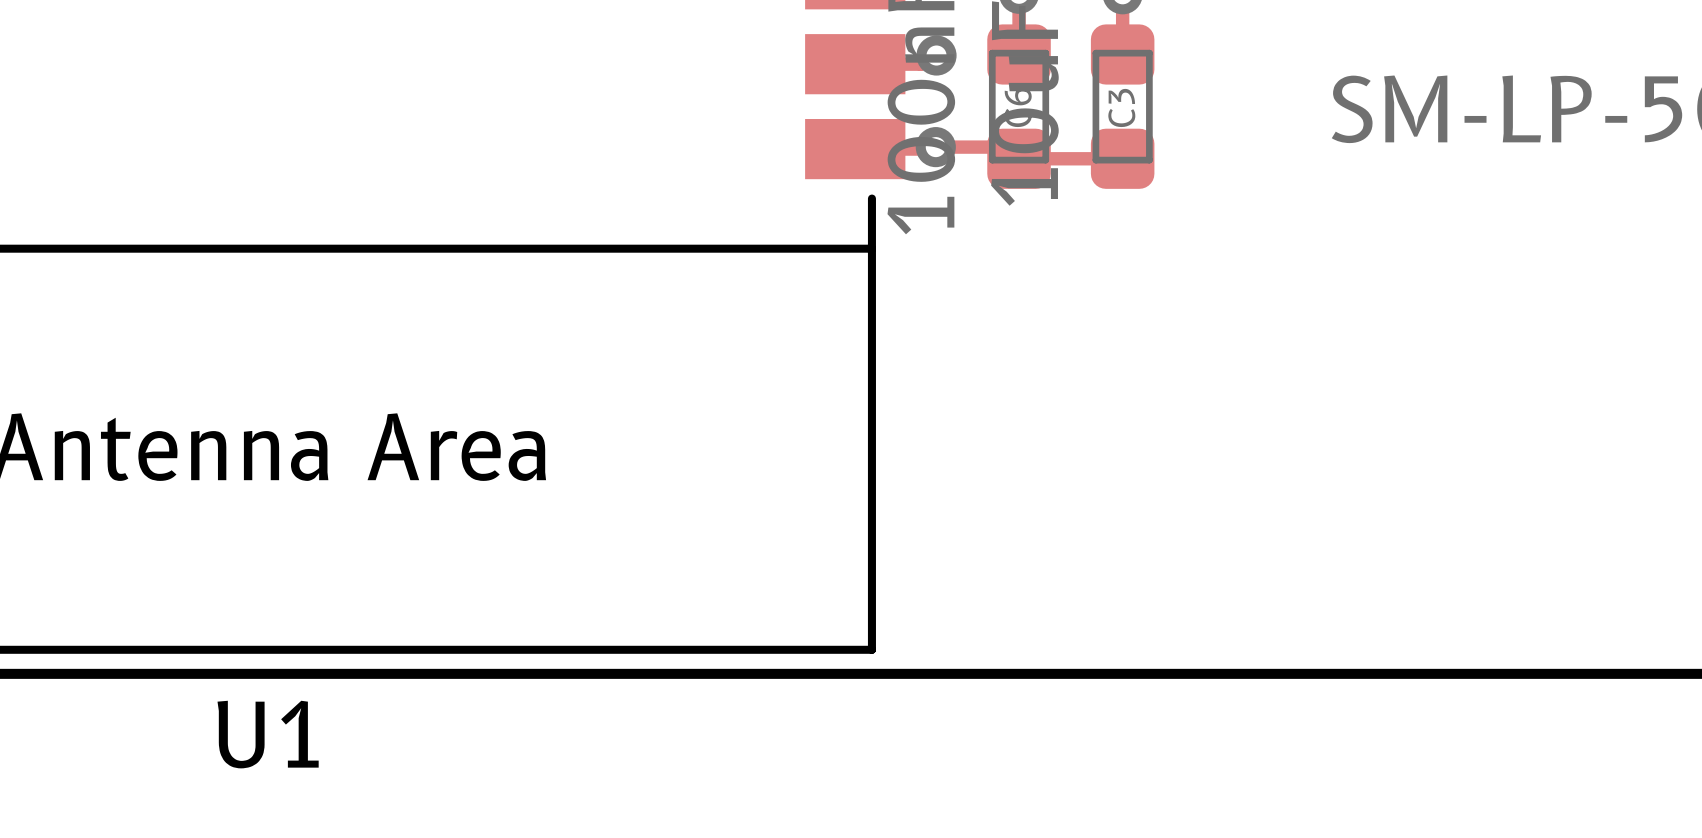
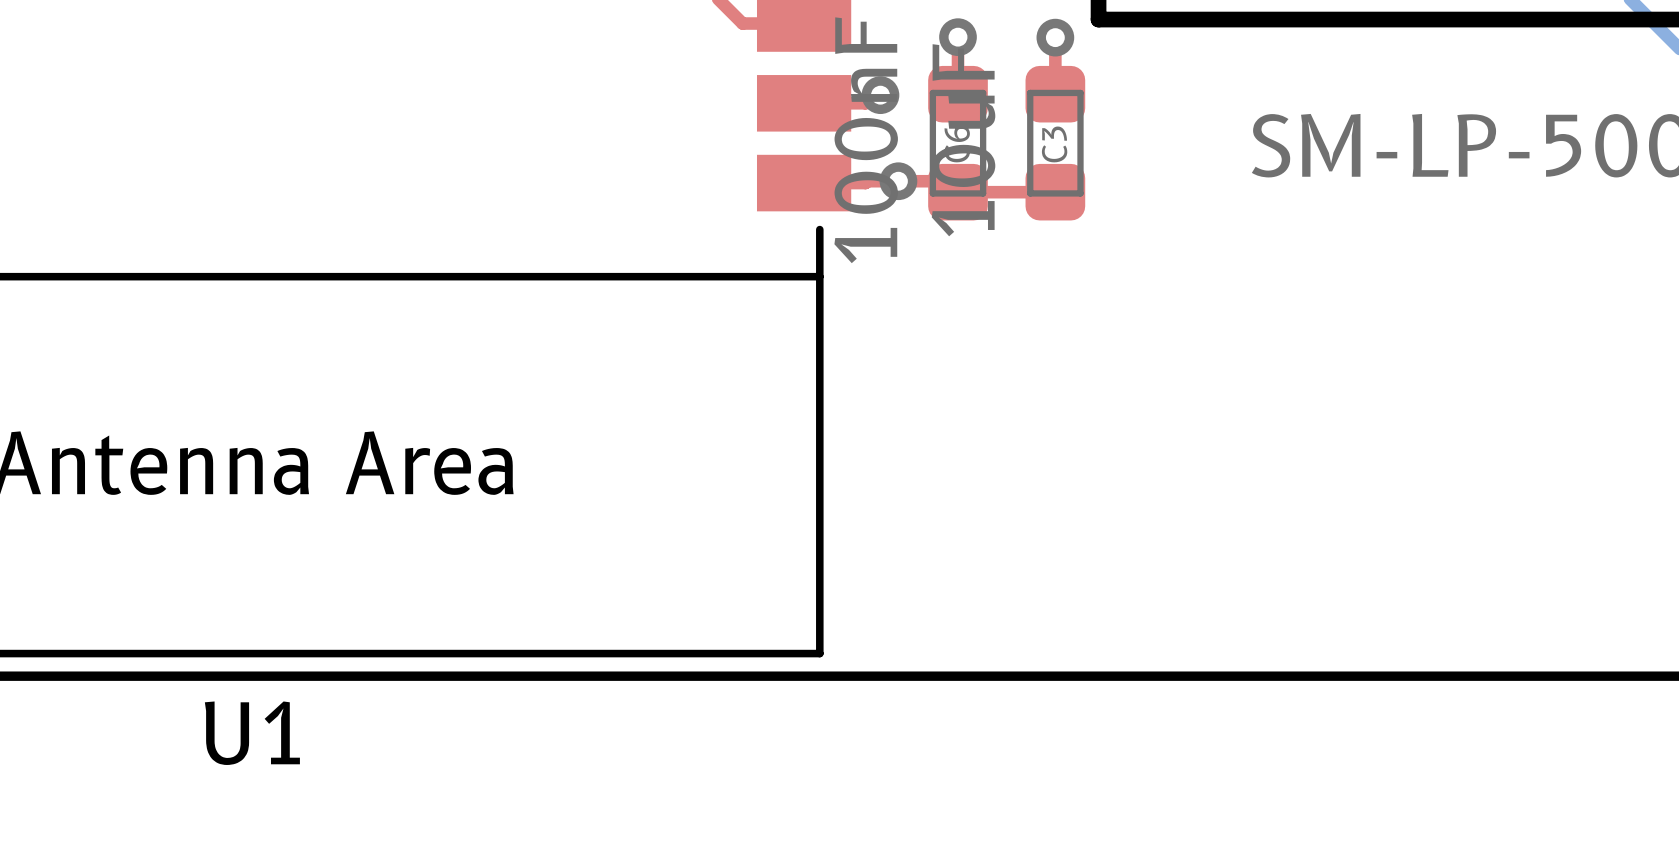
via position: (935, 147) -> (898, 181)

